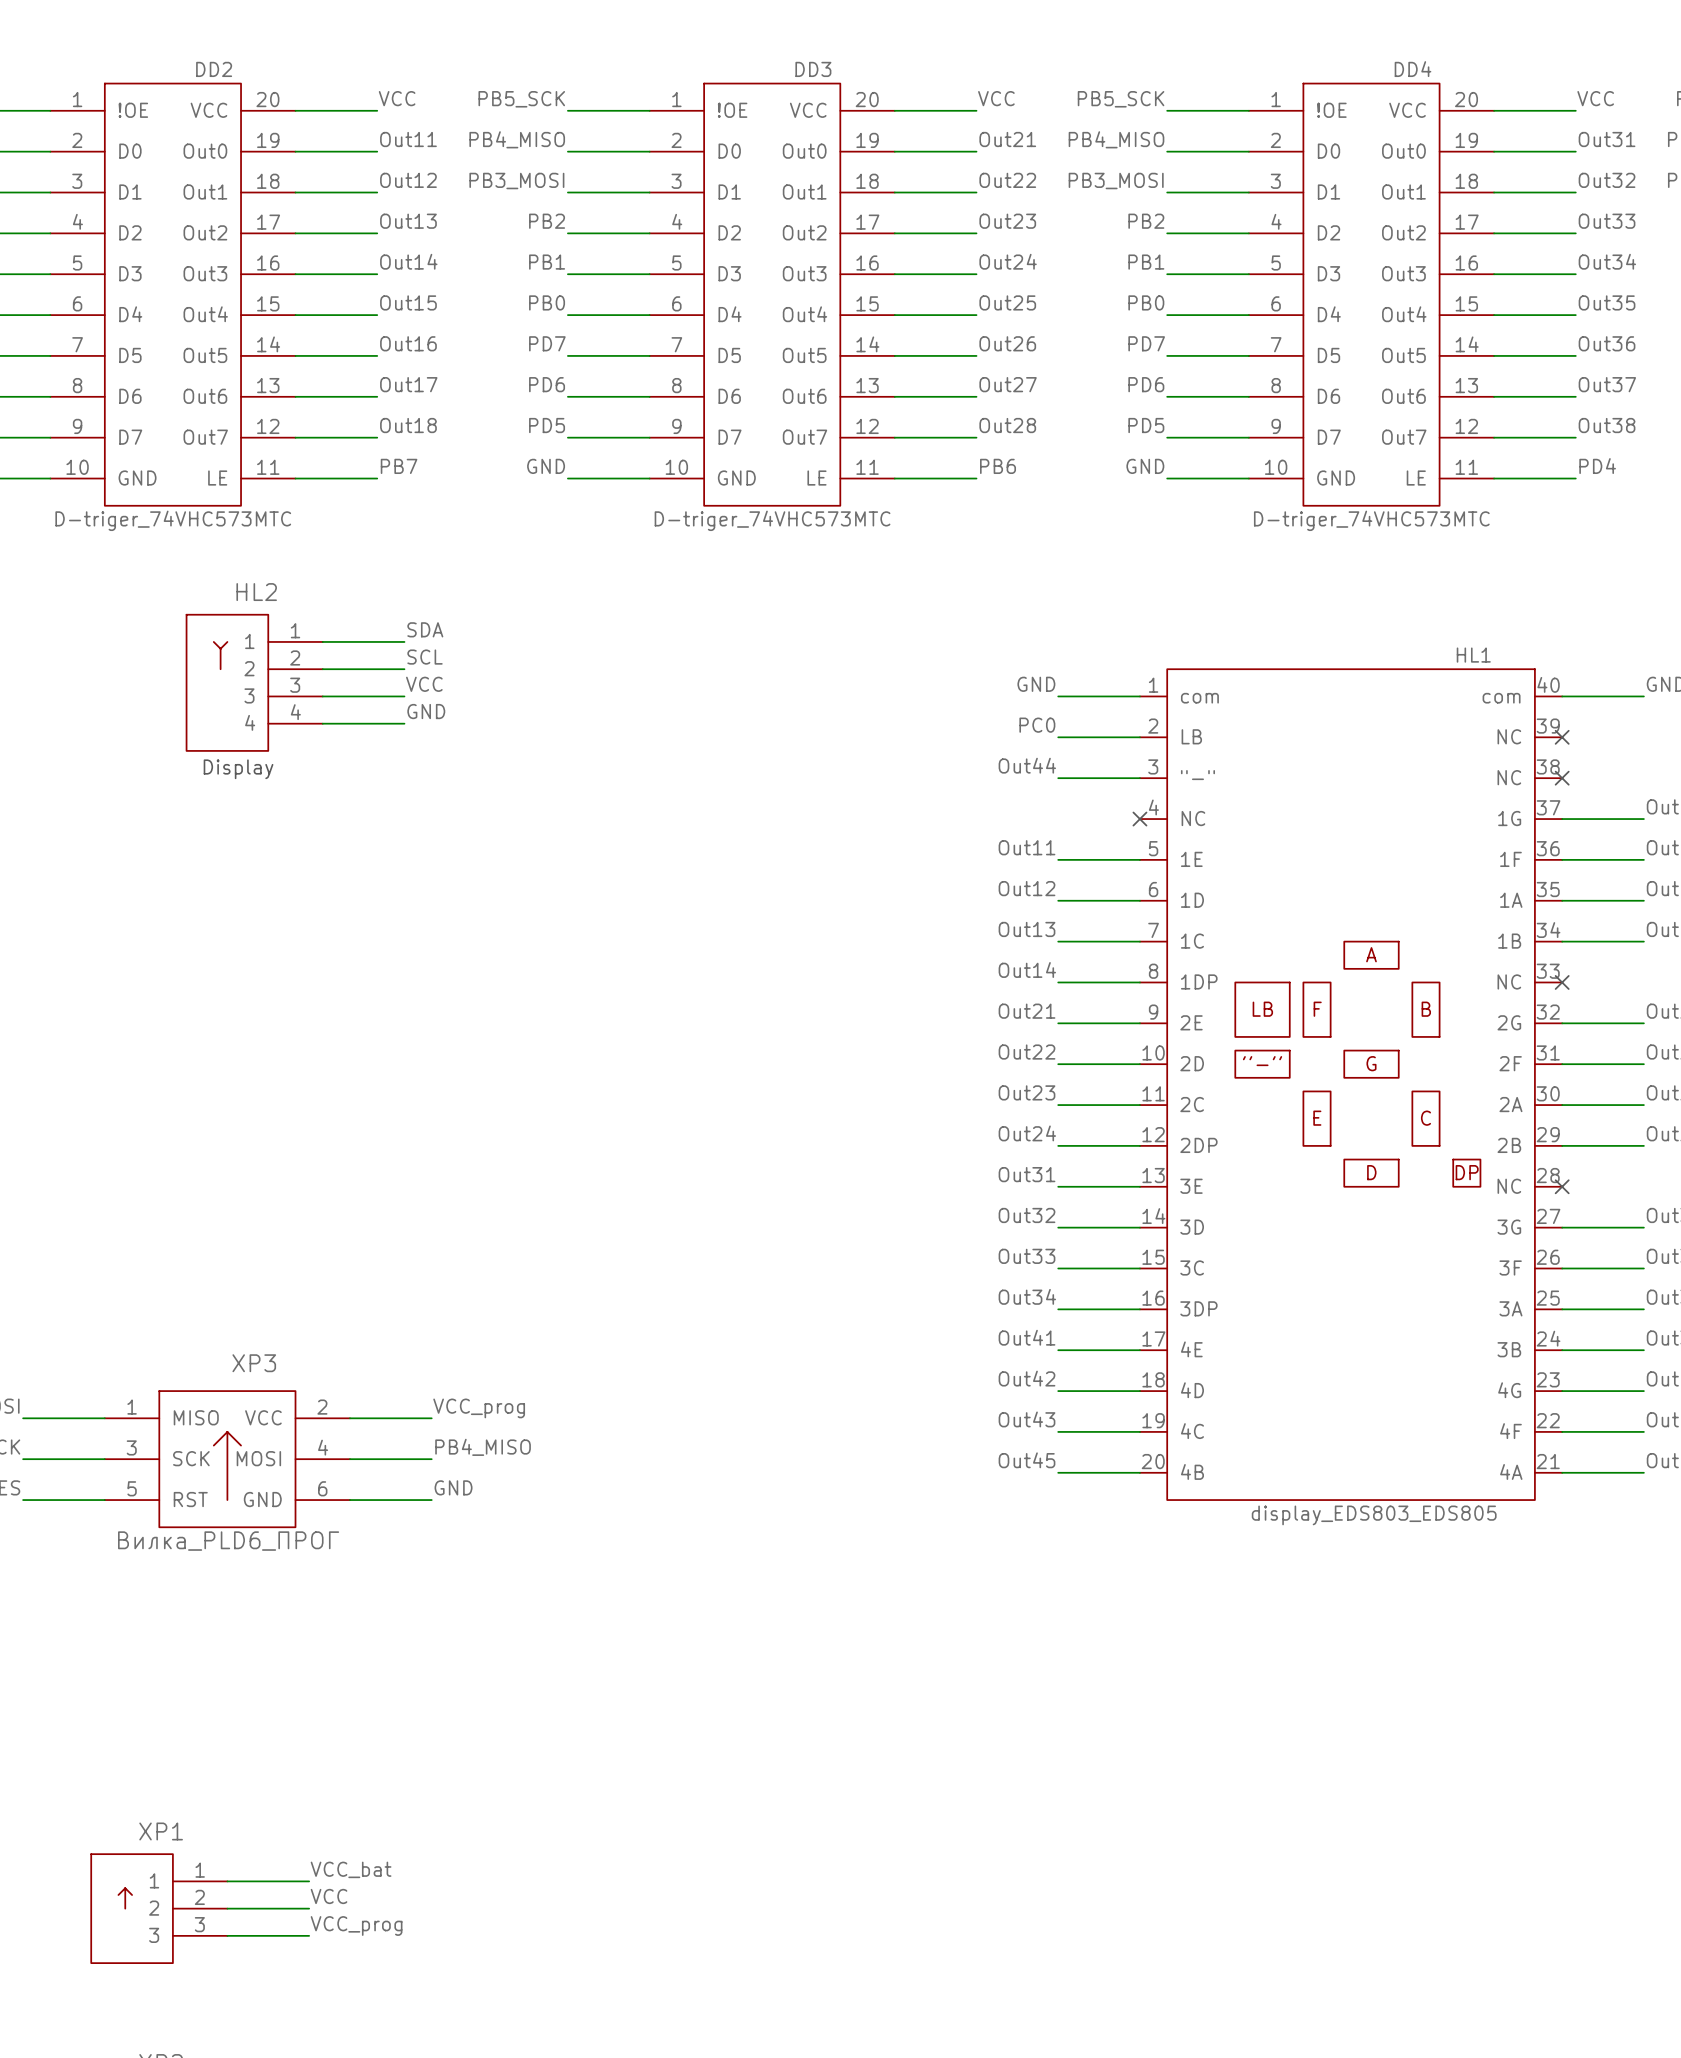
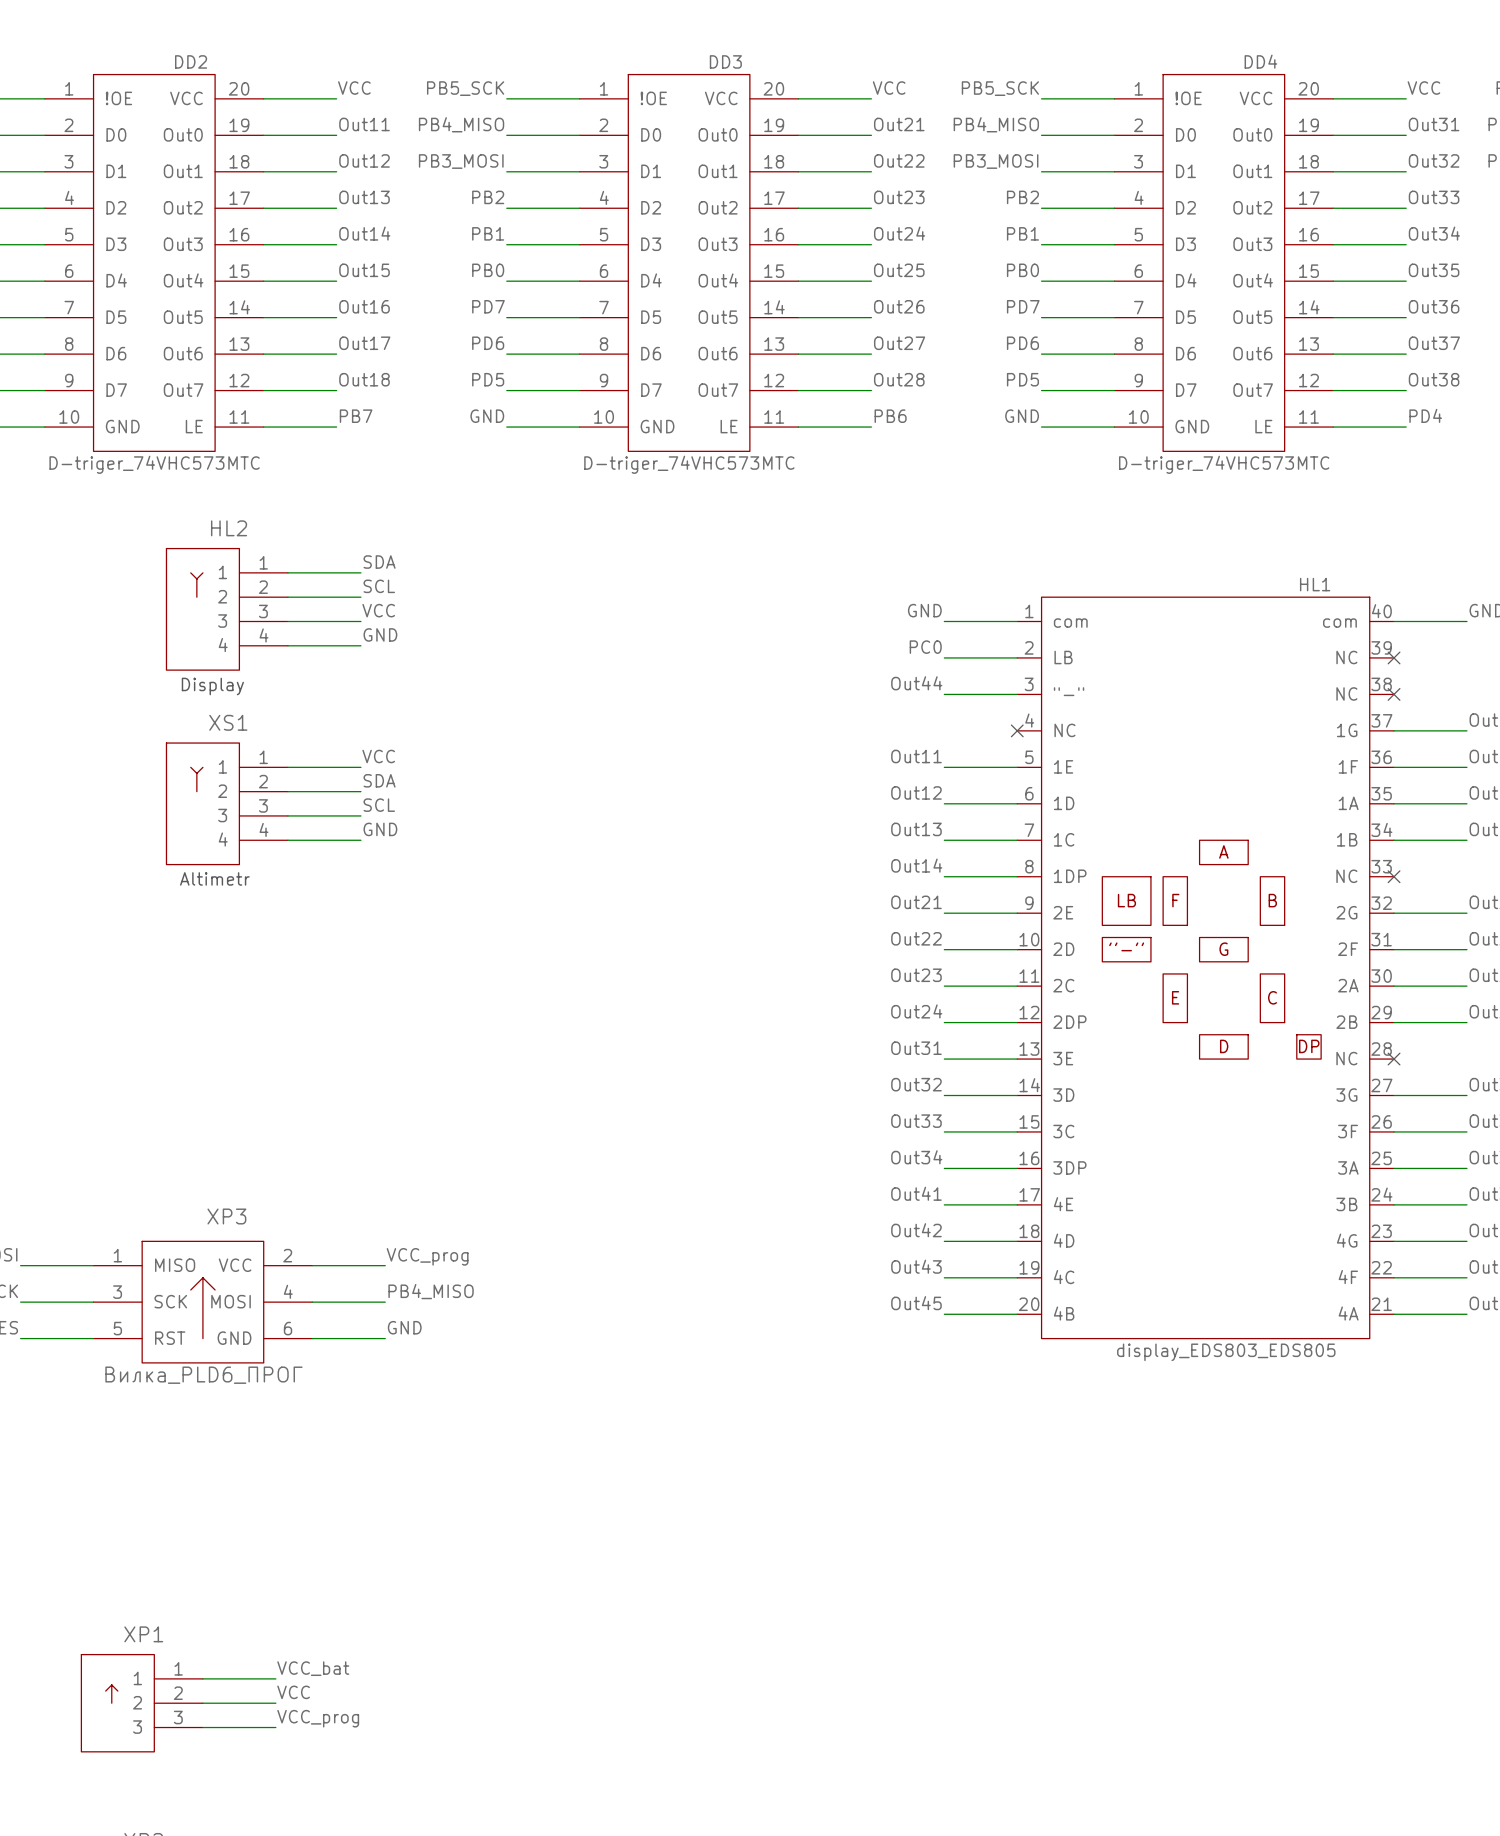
label: none -> VCC (378, 756)
wire: none -> (288, 767) (360, 767)
label: none -> SDA (379, 780)
wire: none -> (288, 791) (360, 791)
XS1: none -> (227, 803)
label: none -> SCL (379, 805)
wire: none -> (288, 815) (360, 815)
label: none -> GND (380, 829)
wire: none -> (288, 840) (360, 840)
text: none -> Altimetr (214, 878)

